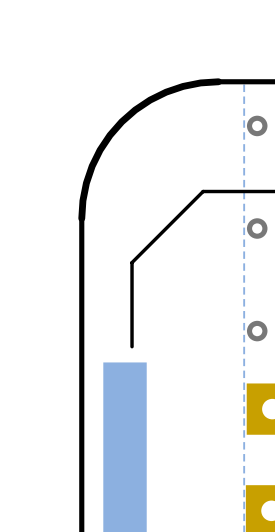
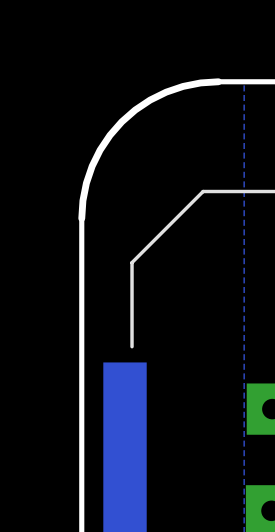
via: (257, 125) -> none
via: (257, 228) -> none
via: (257, 331) -> none

